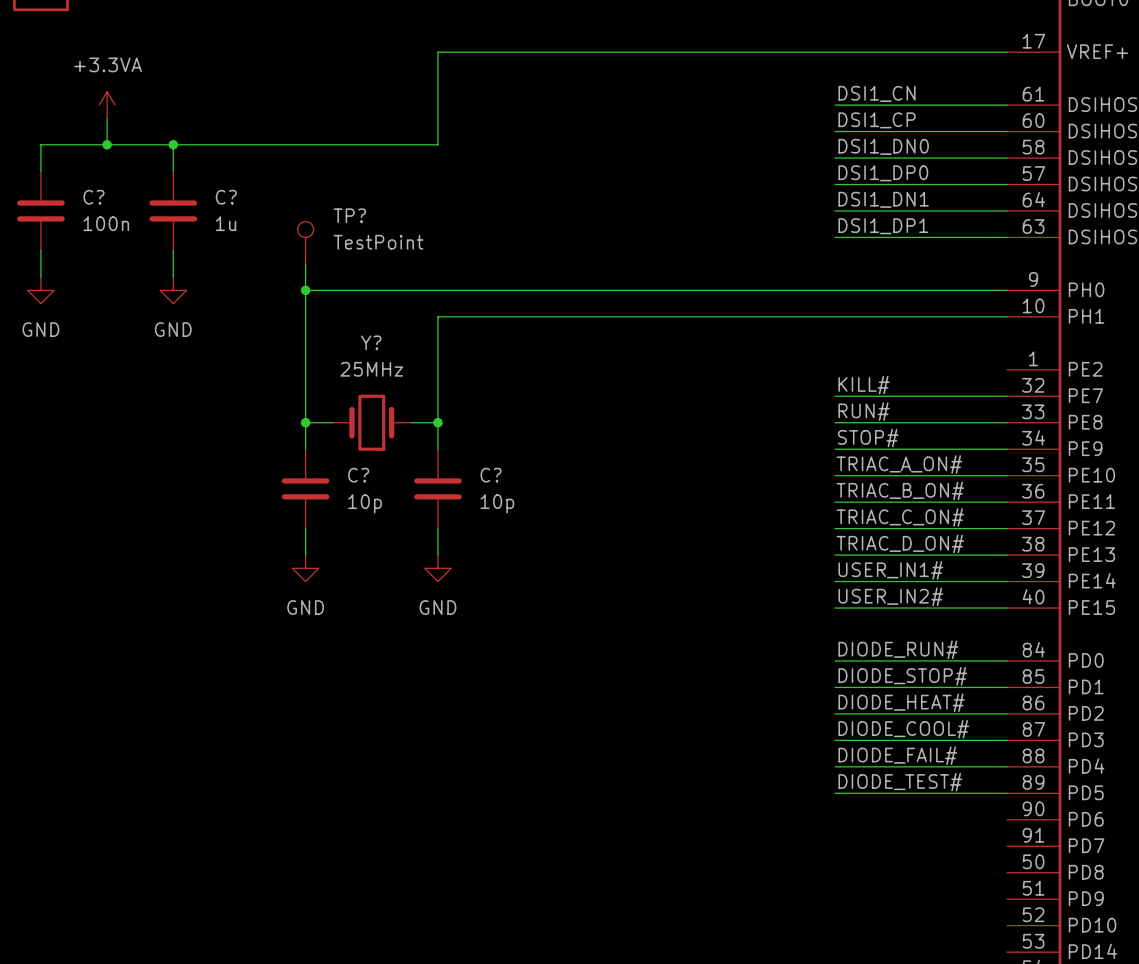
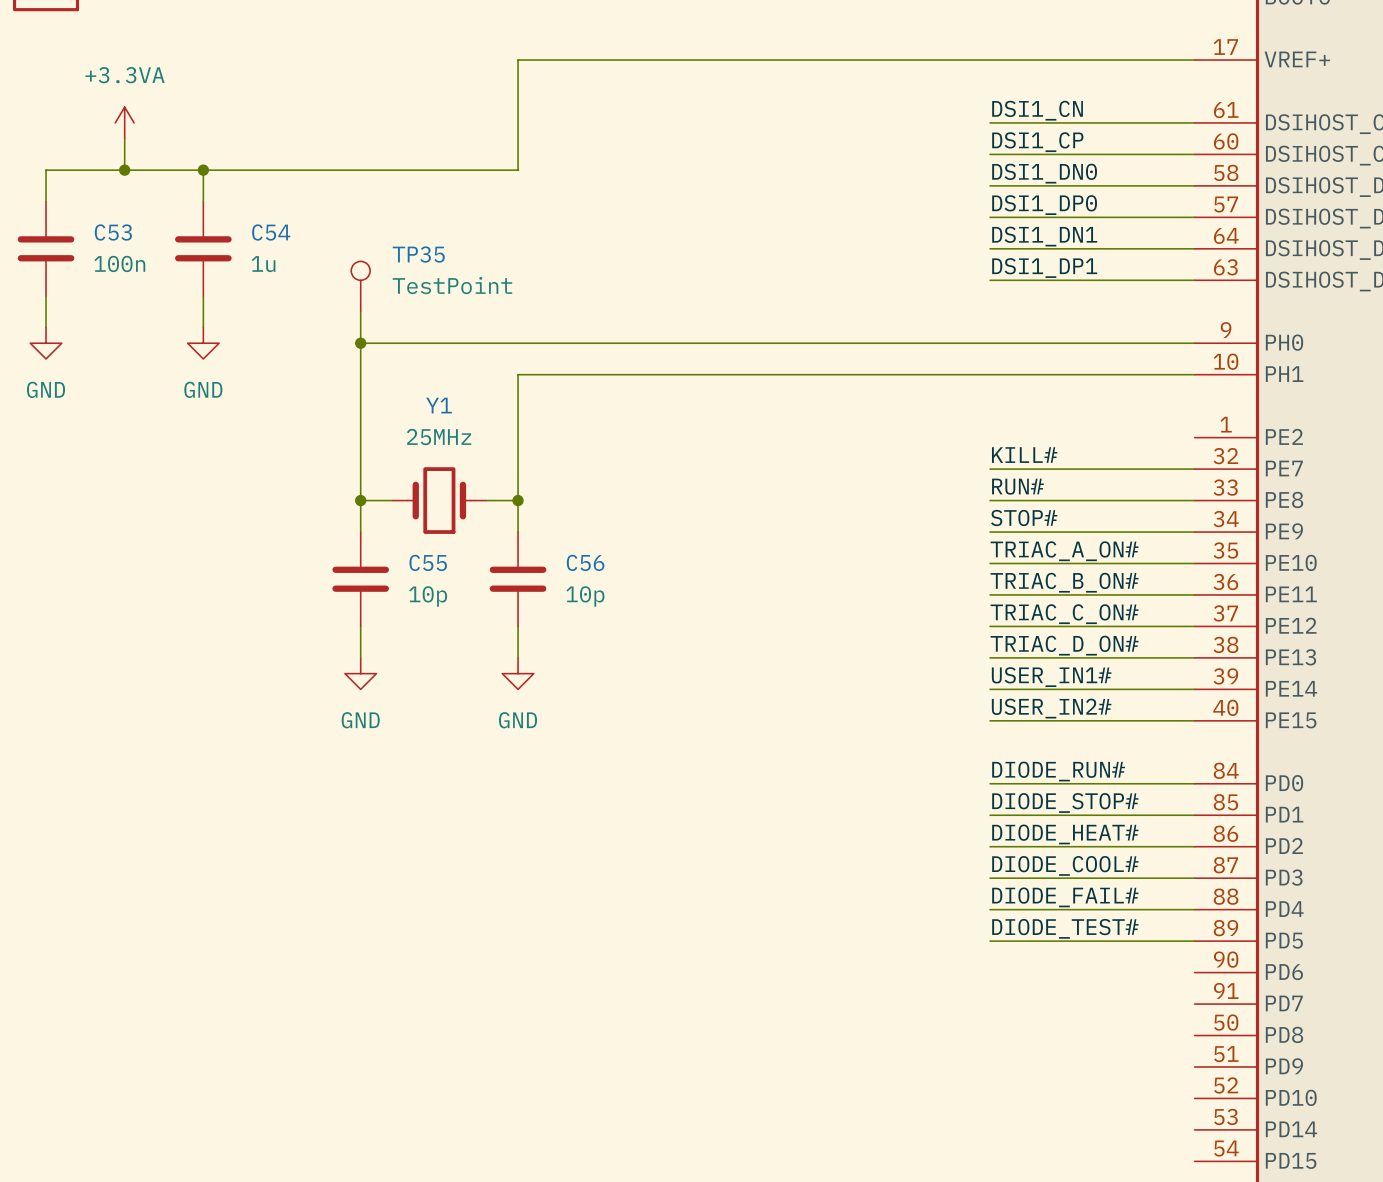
C? name: C? (93, 197) -> C53 (113, 232)
C? name: C? (226, 197) -> C54 (271, 232)
TP? name: TP? (349, 215) -> TP35 (418, 254)
Y? name: Y? (371, 342) -> Y1 (439, 405)
C? name: C? (358, 475) -> C55 (428, 562)
C? name: C? (491, 475) -> C56 (585, 562)

